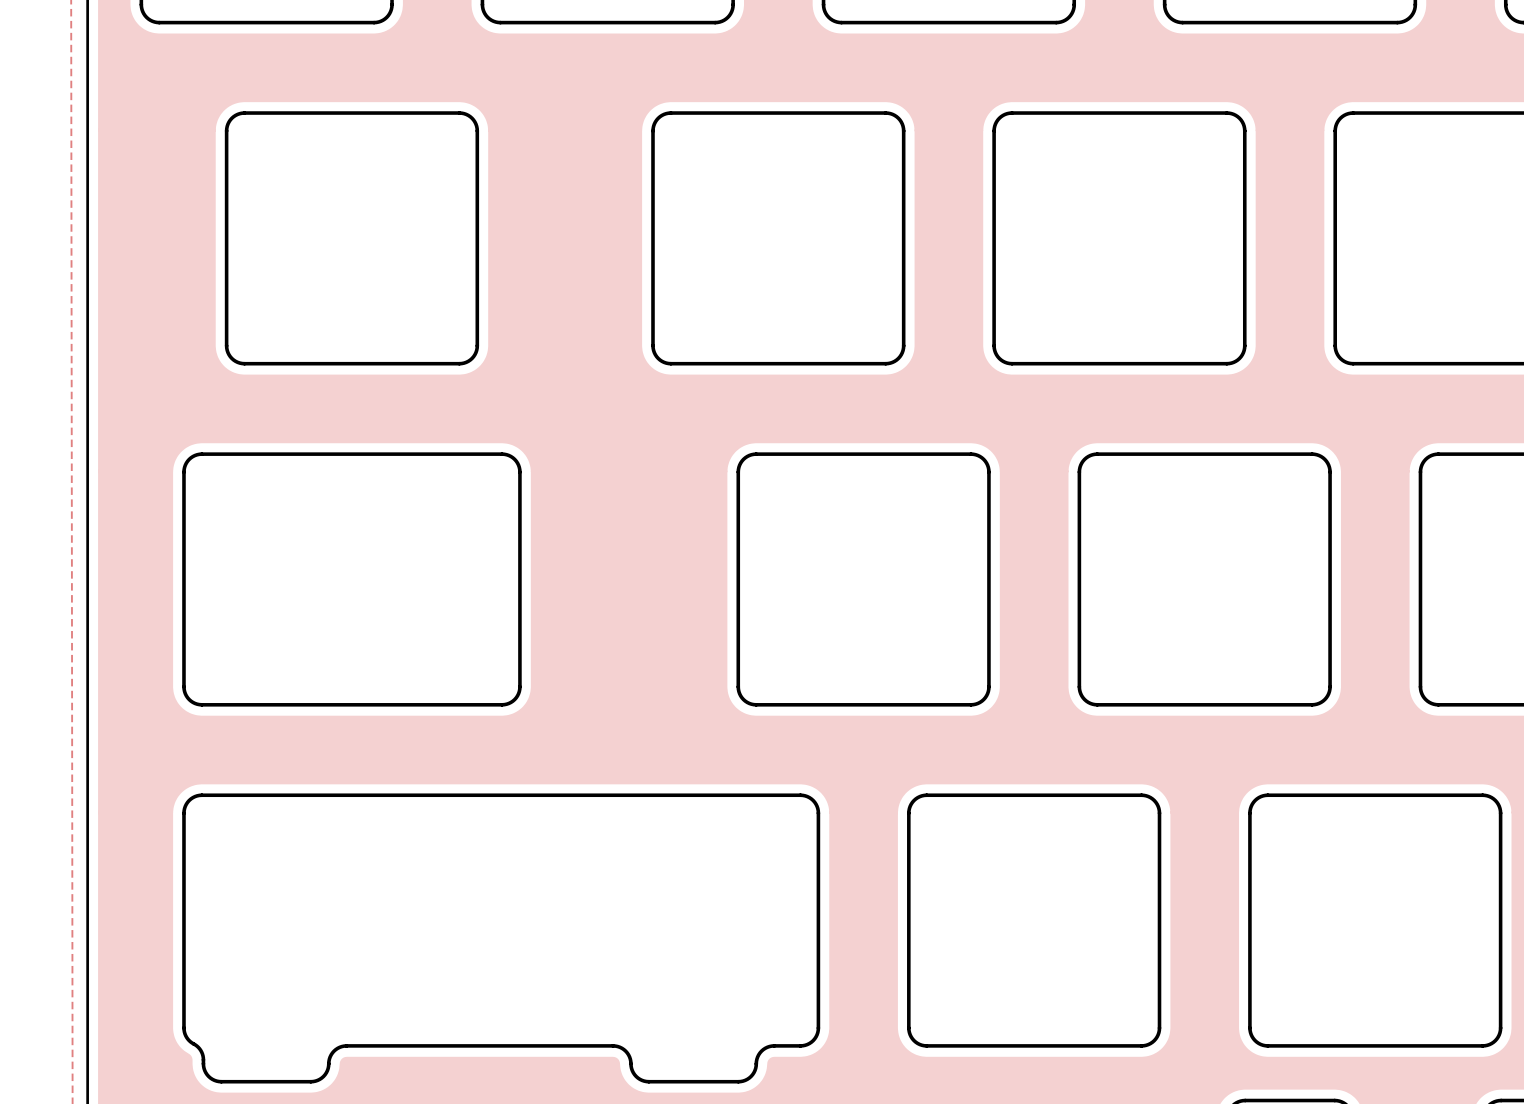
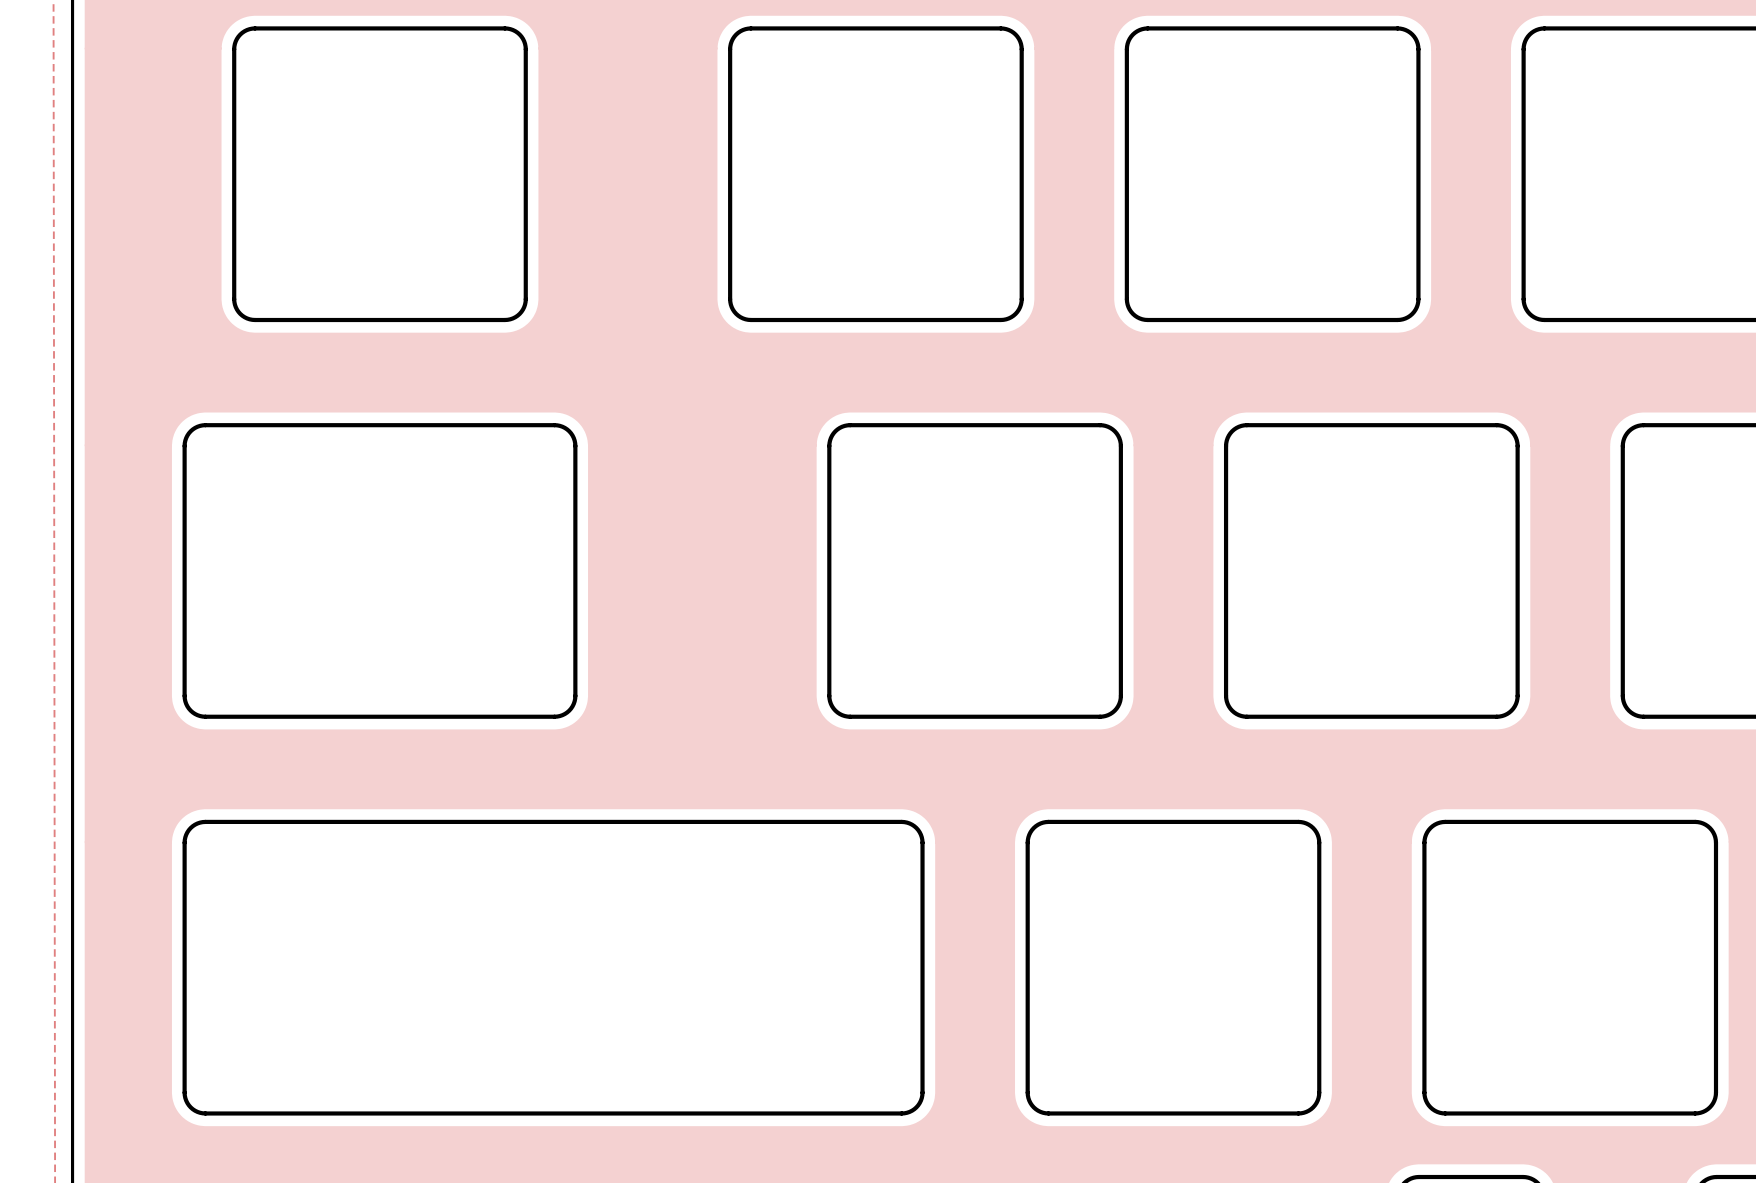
board edge: (183, 1028) (187, 1038) (201, 1052) (205, 1072) (210, 1078) (219, 1081) (315, 1081) (326, 1072) (330, 1056) (334, 1051) (346, 1045) -> (184, 1092) (186, 1100) (190, 1107) (202, 1113) (373, 1113)
board edge: (613, 1045) (625, 1051) (629, 1056) (634, 1074) (639, 1079) (648, 1081) (743, 1081) (753, 1072) (757, 1056) (761, 1051) (774, 1045) -> (683, 1113) (871, 1113)

